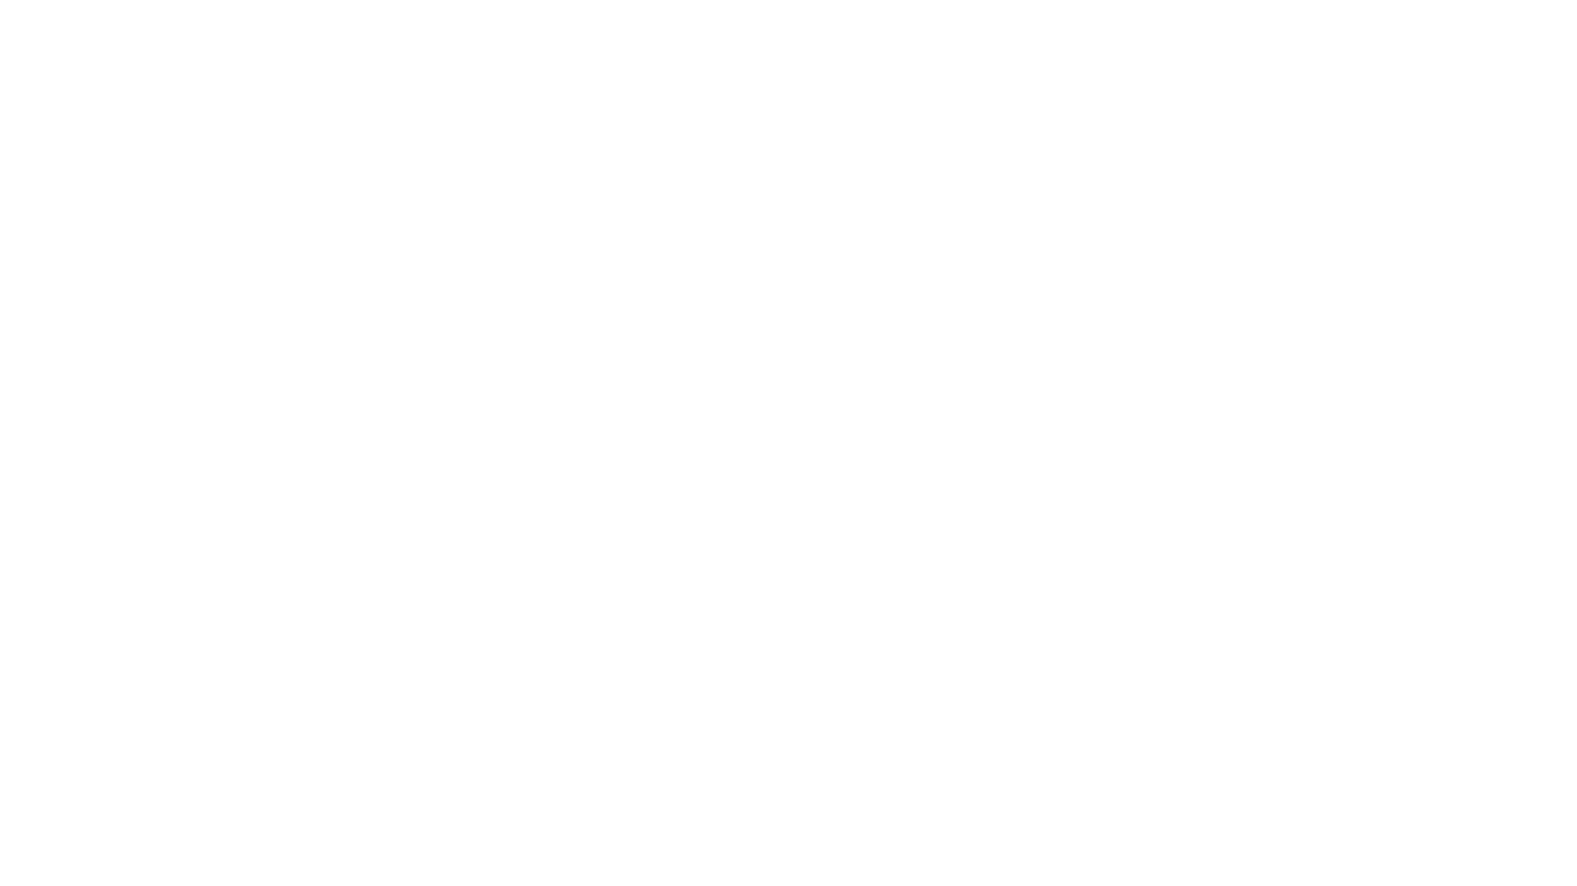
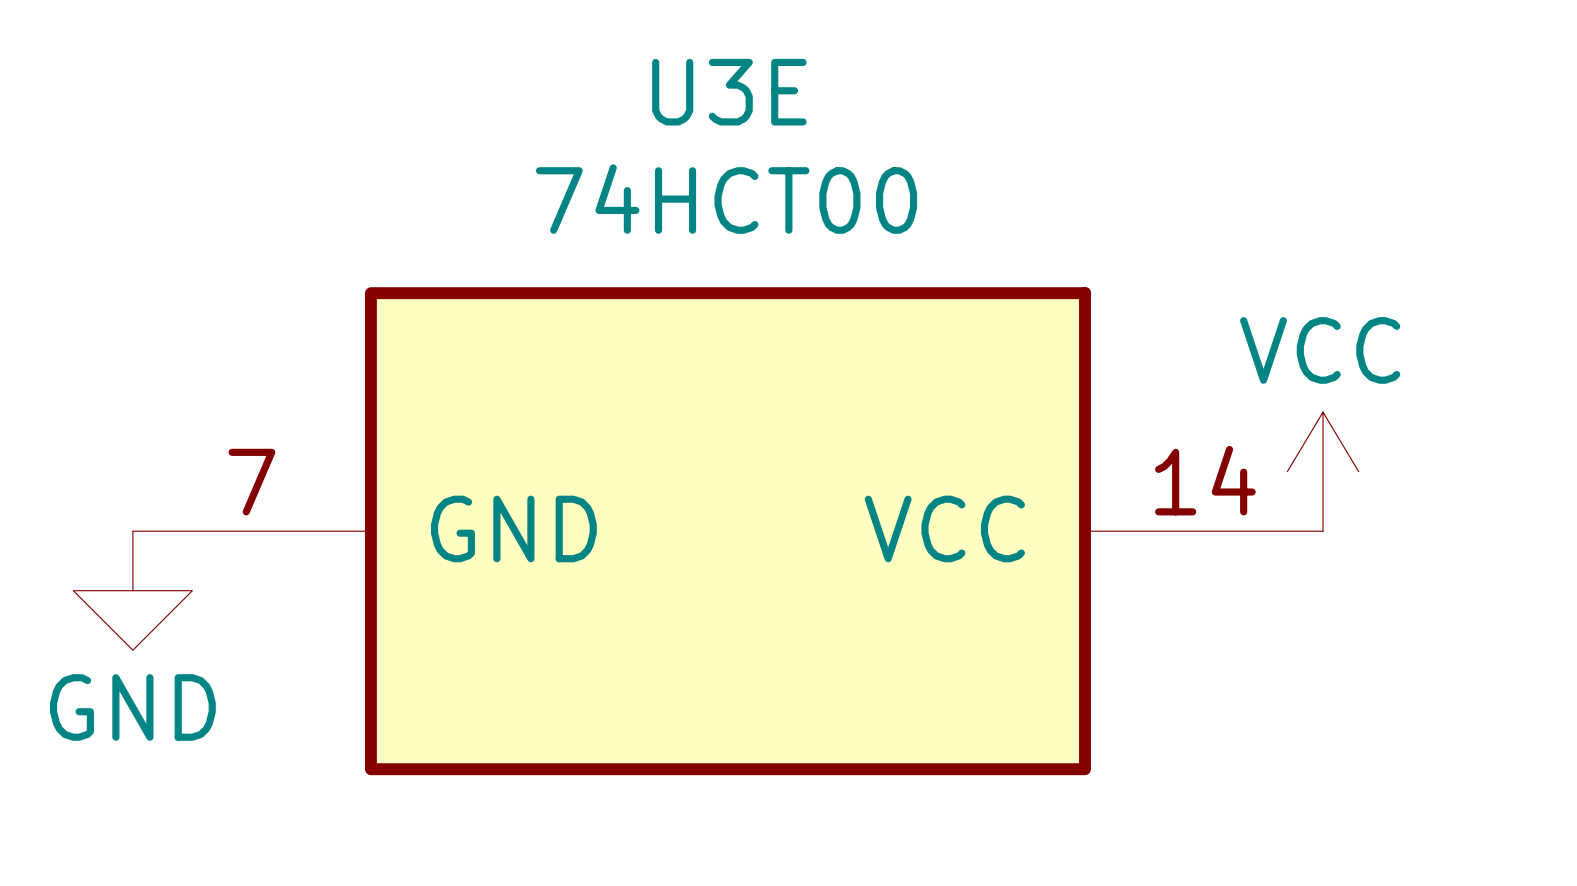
power symbol: none -> VCC (1323, 471)
U3E: none -> 74HCT00 (727, 531)
power symbol: none -> GND (132, 590)

